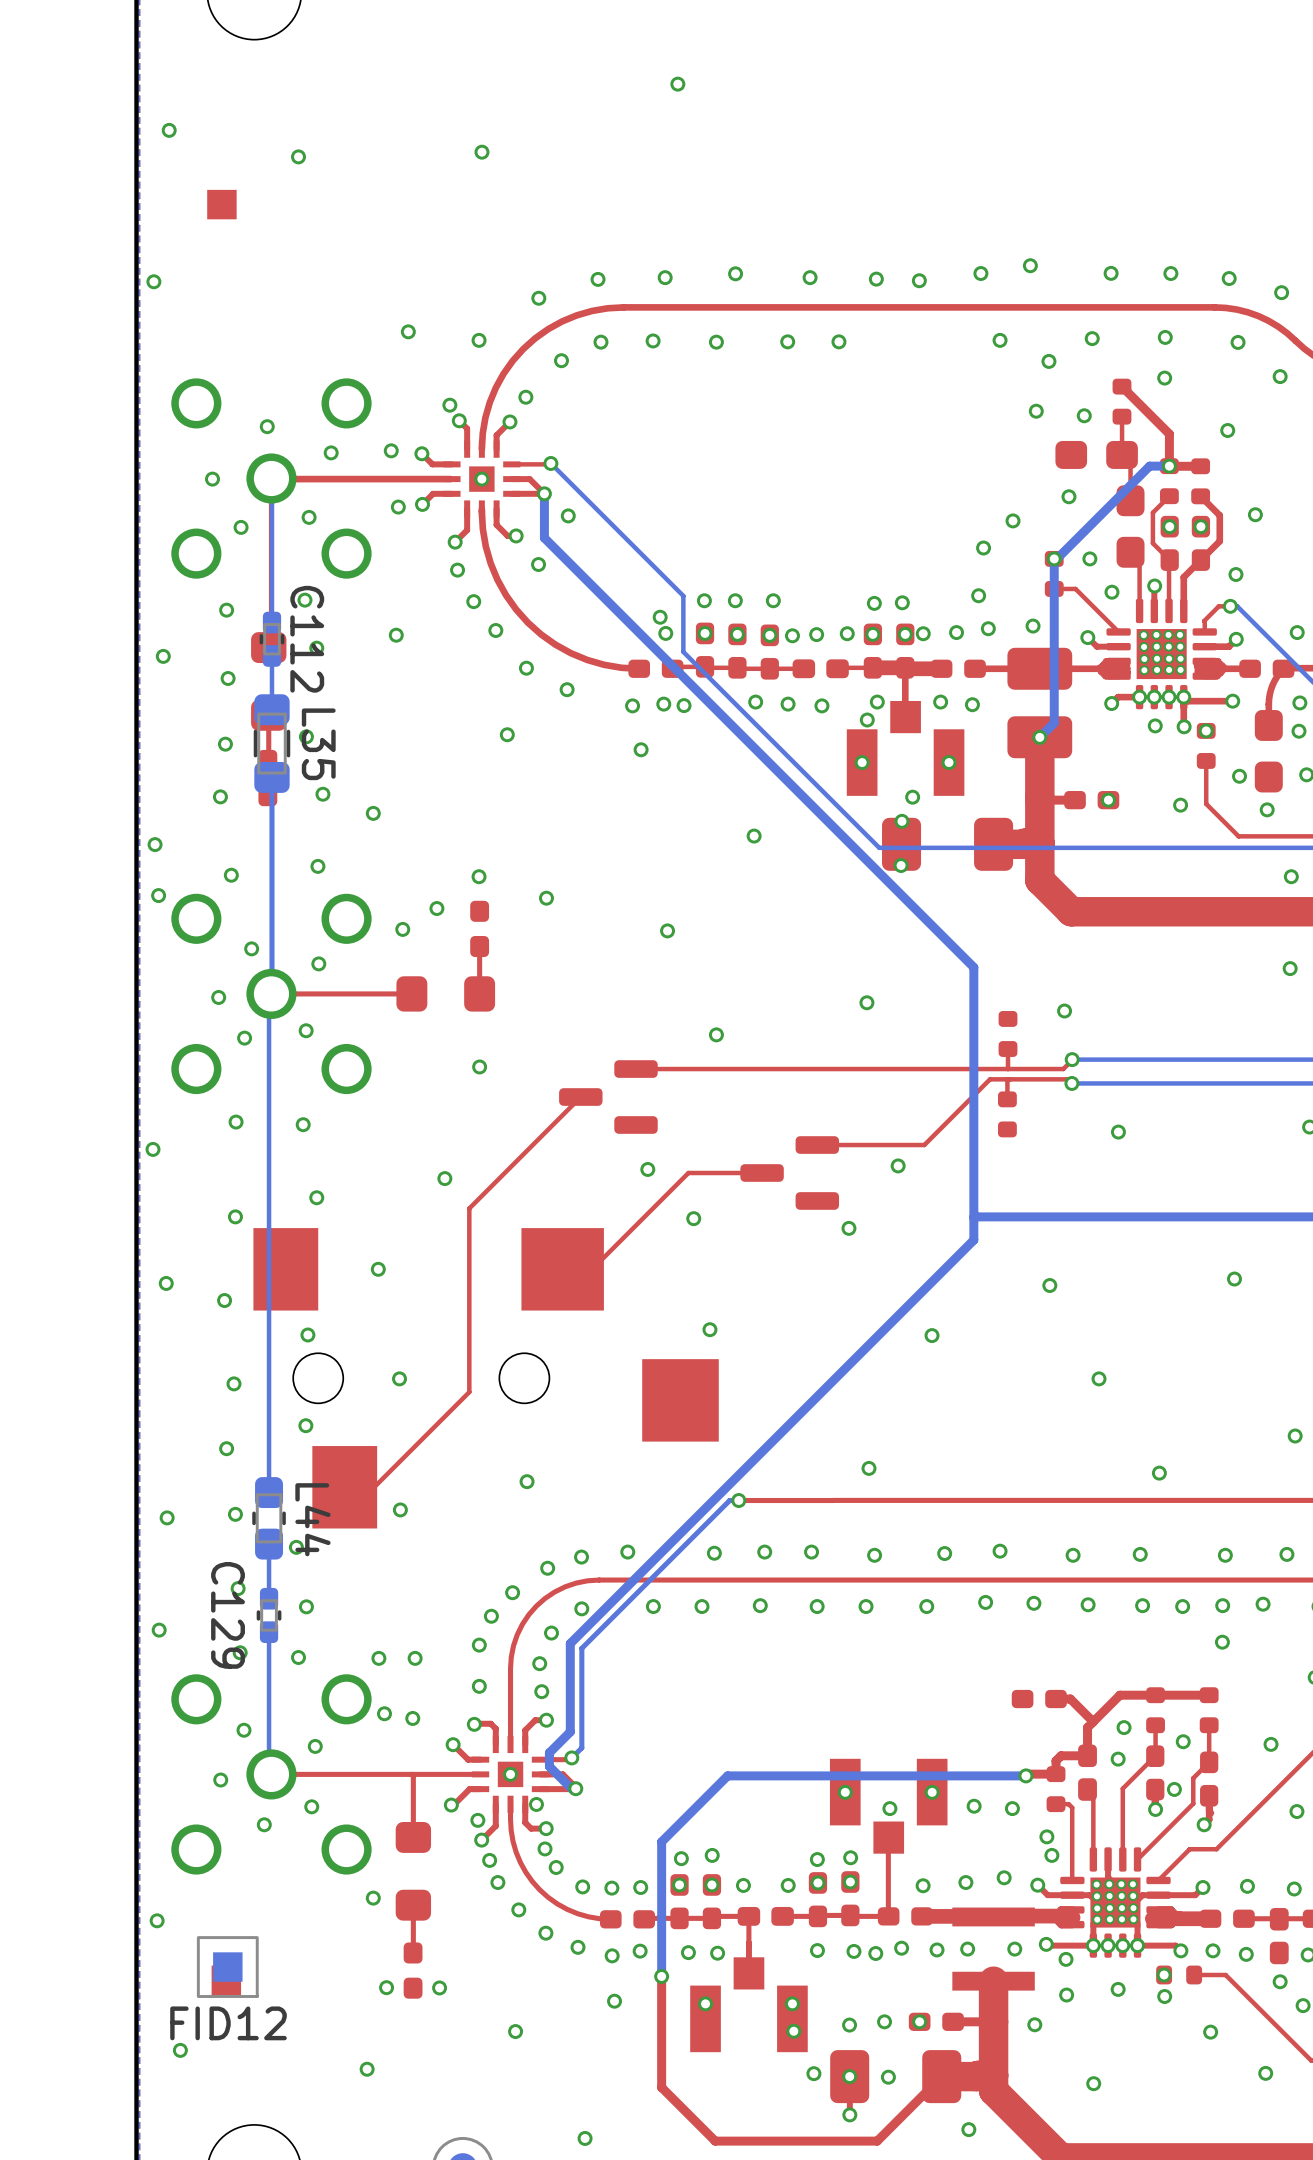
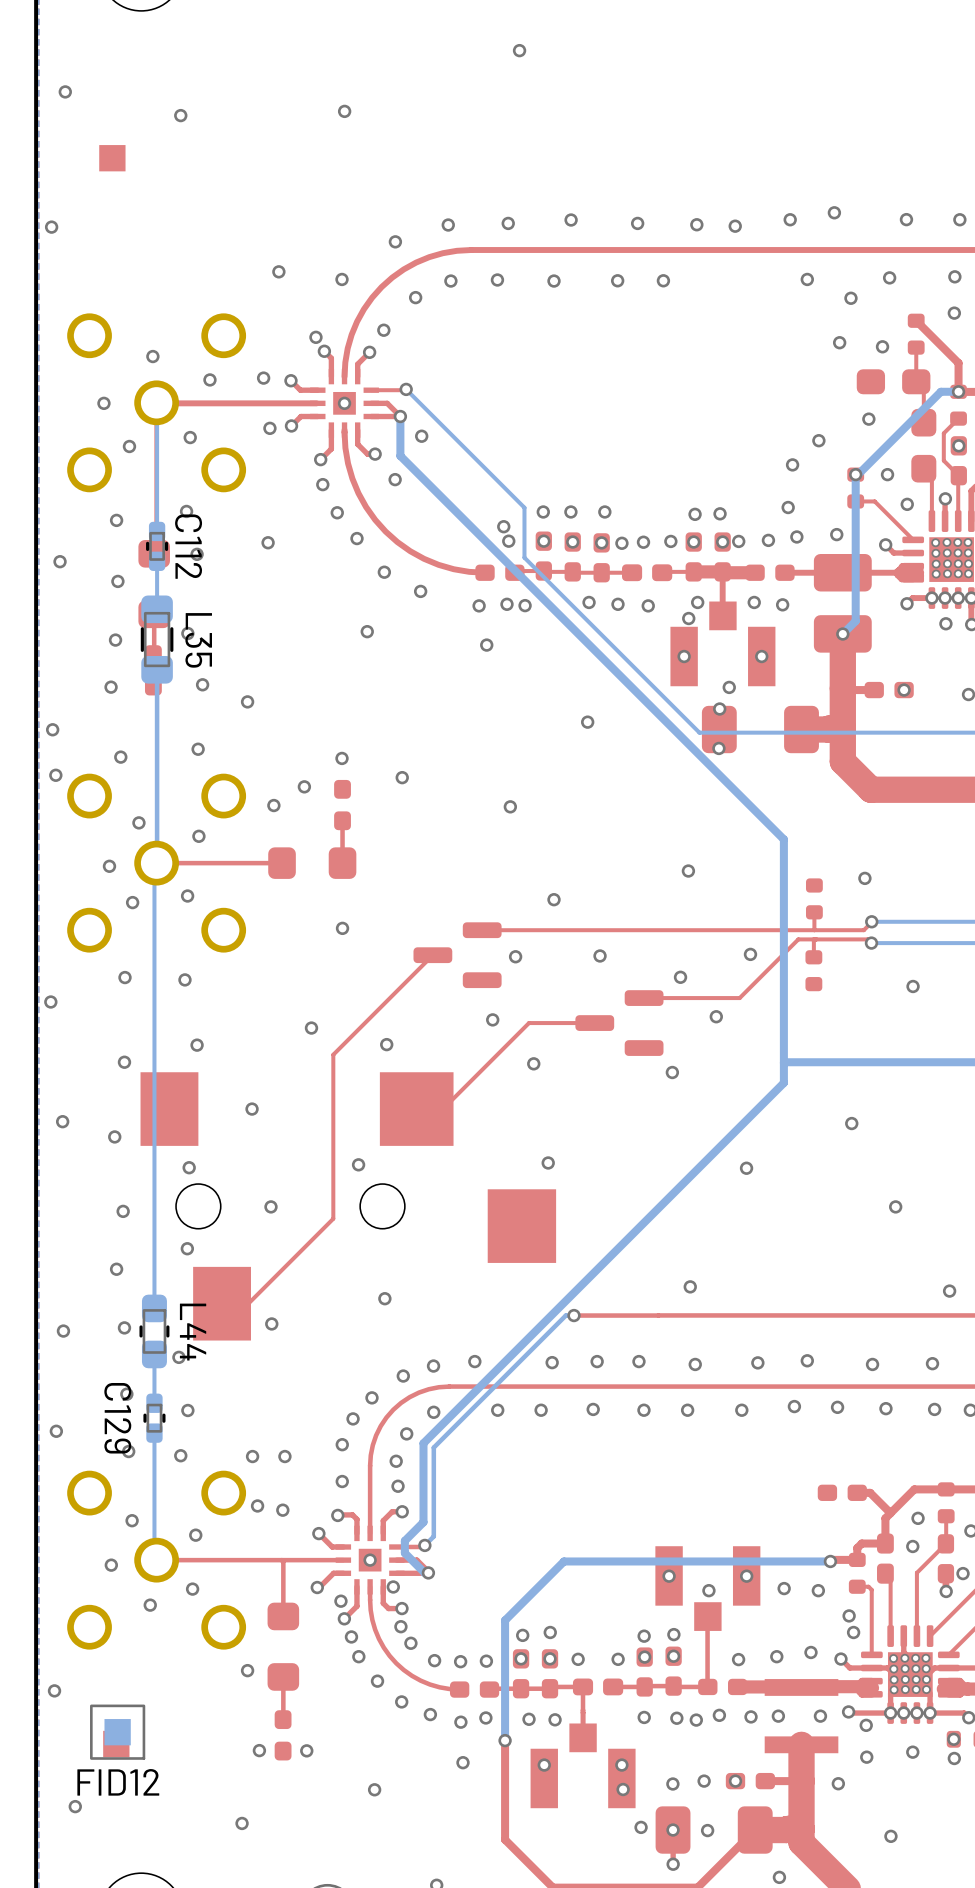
via: none -> (750, 954)
via: none -> (600, 955)
via: none -> (515, 956)
via: none -> (680, 977)
via: none -> (386, 1044)
via: none -> (358, 1164)

